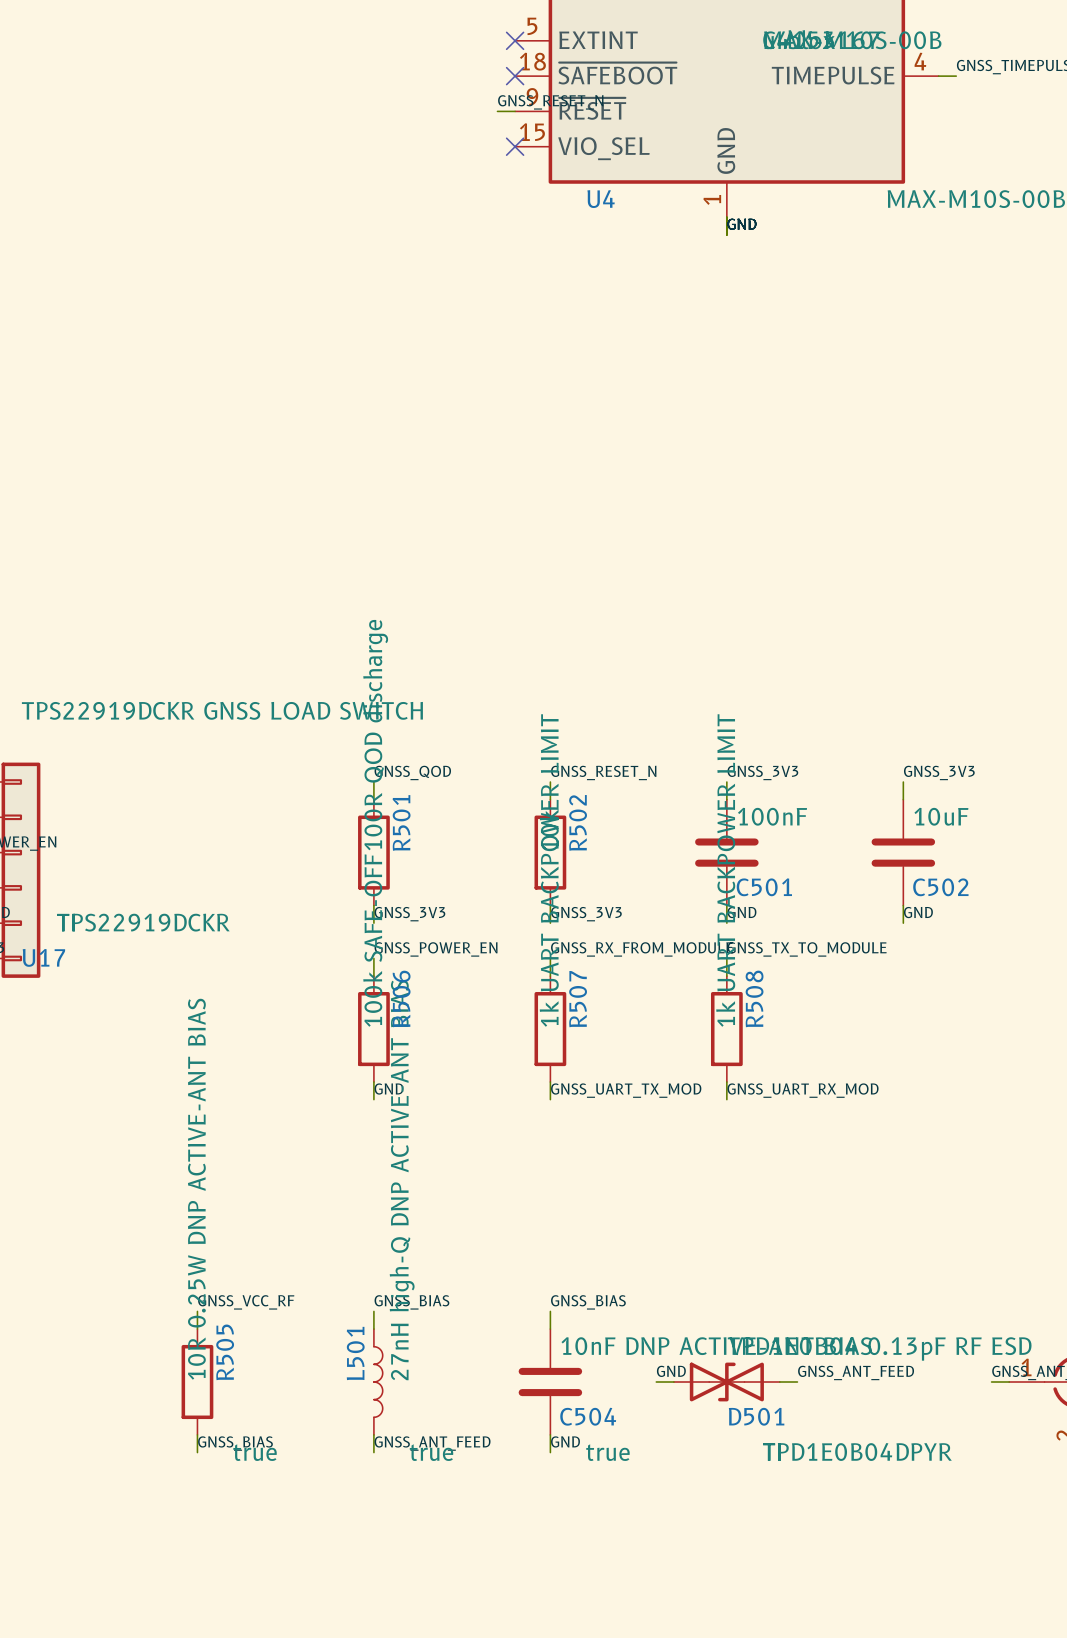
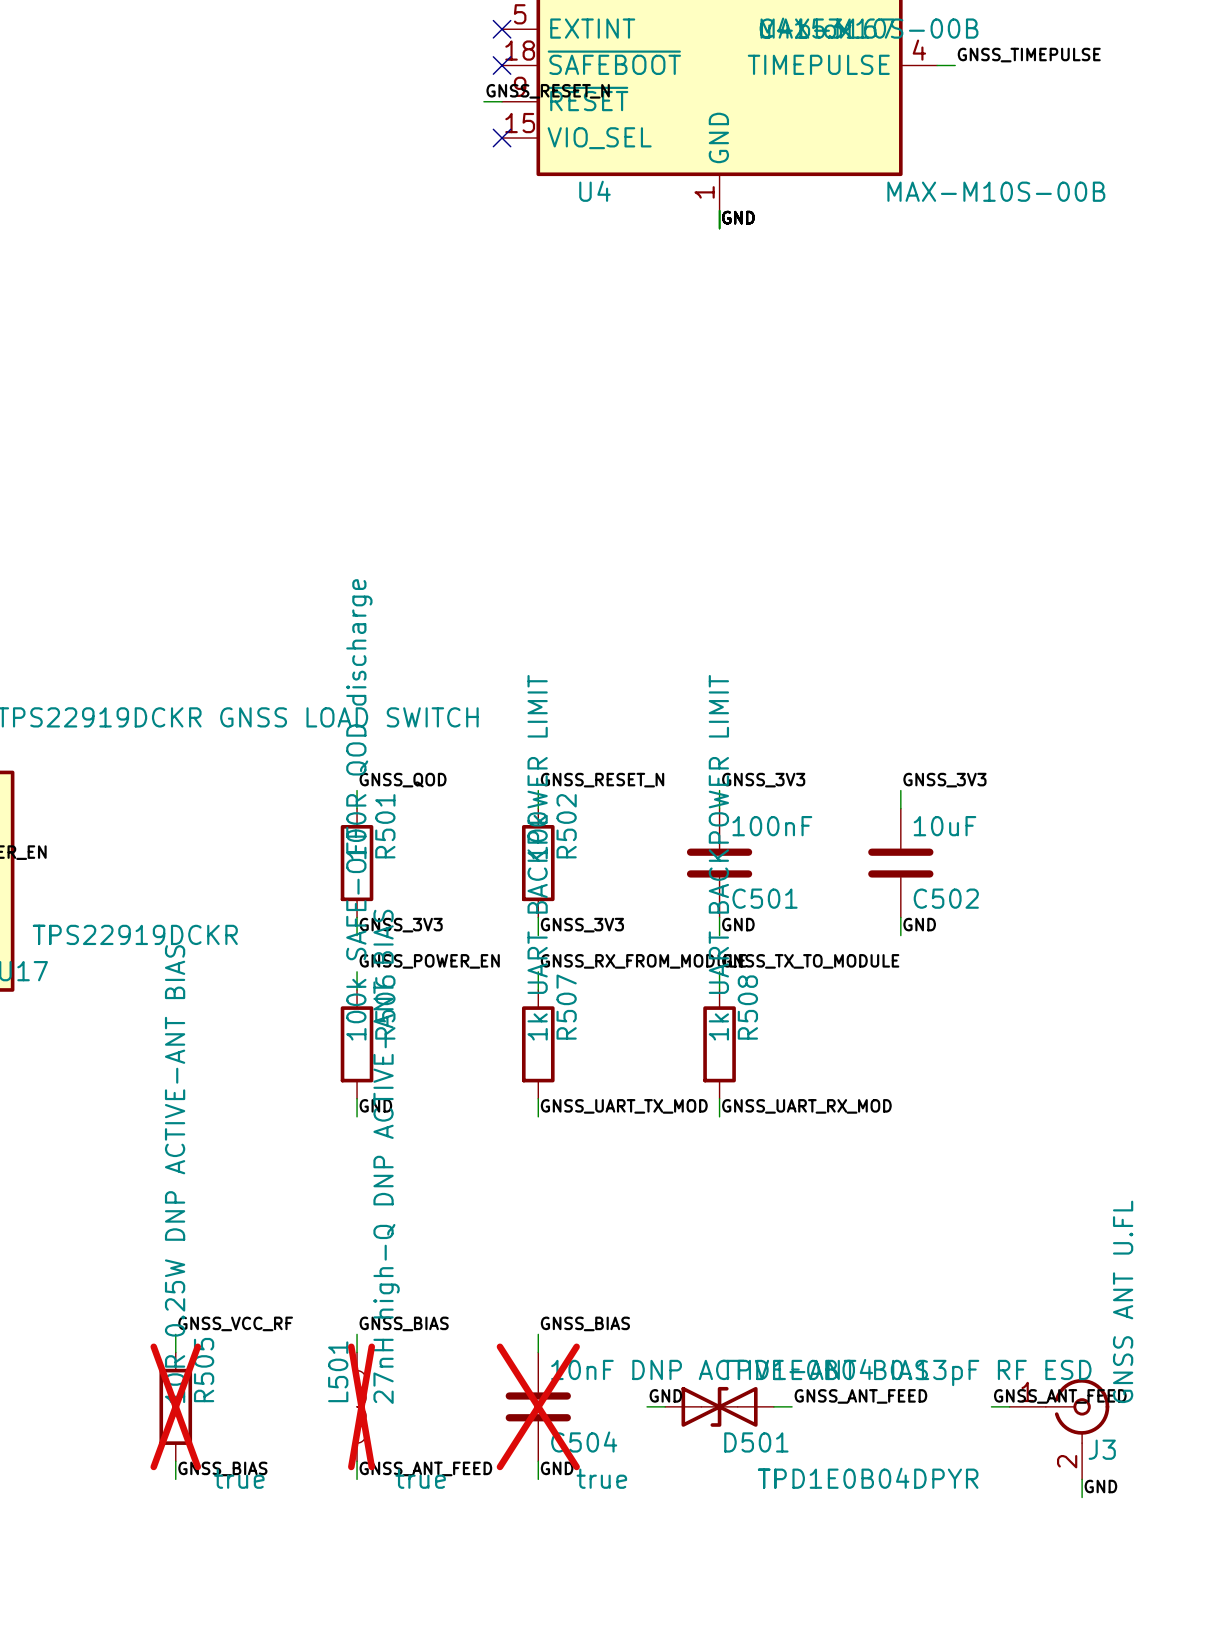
R505 do-not-place cross: none -> (175, 1406)
L501 do-not-place cross: none -> (361, 1406)
C504 do-not-place cross: none -> (538, 1406)

